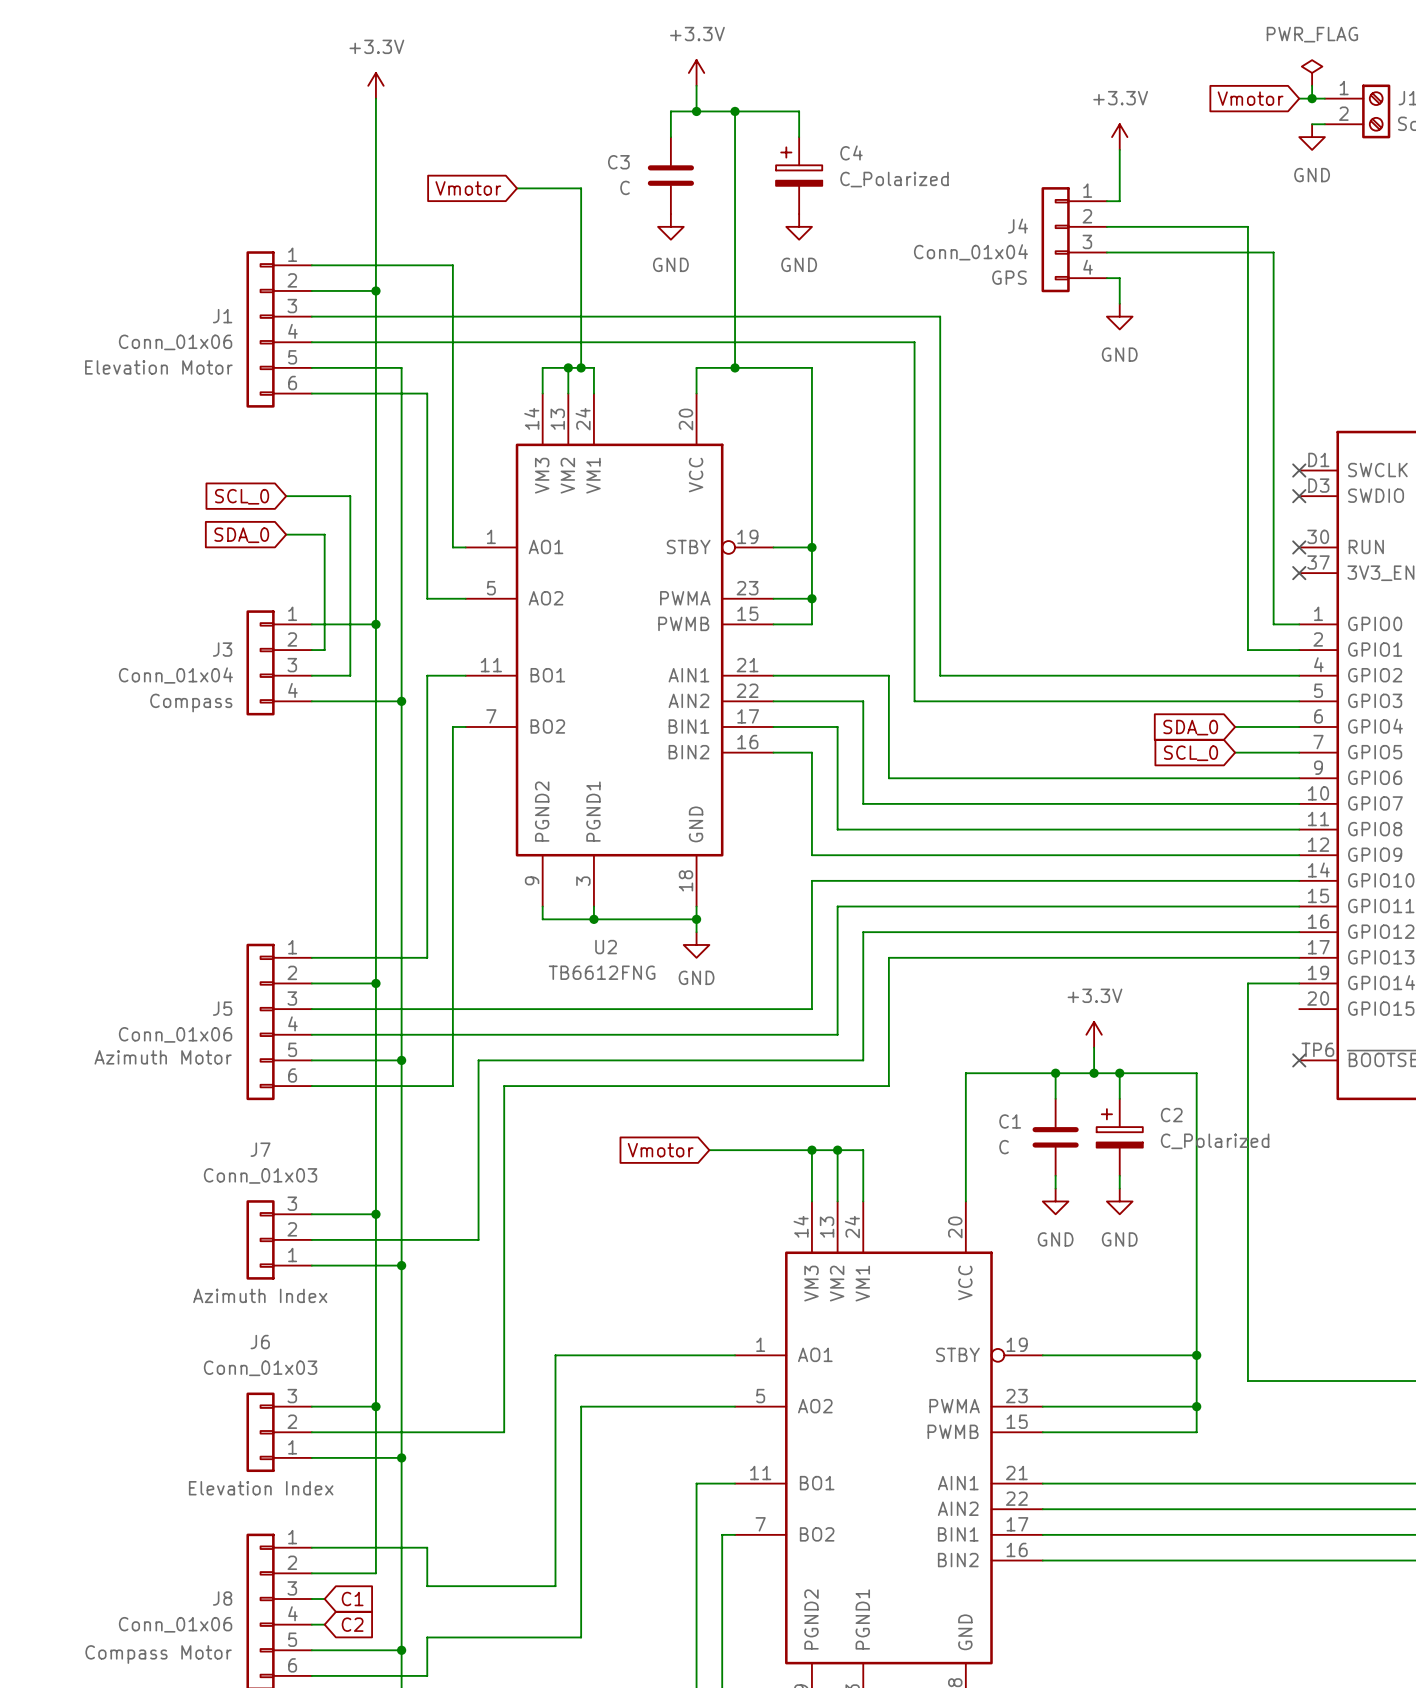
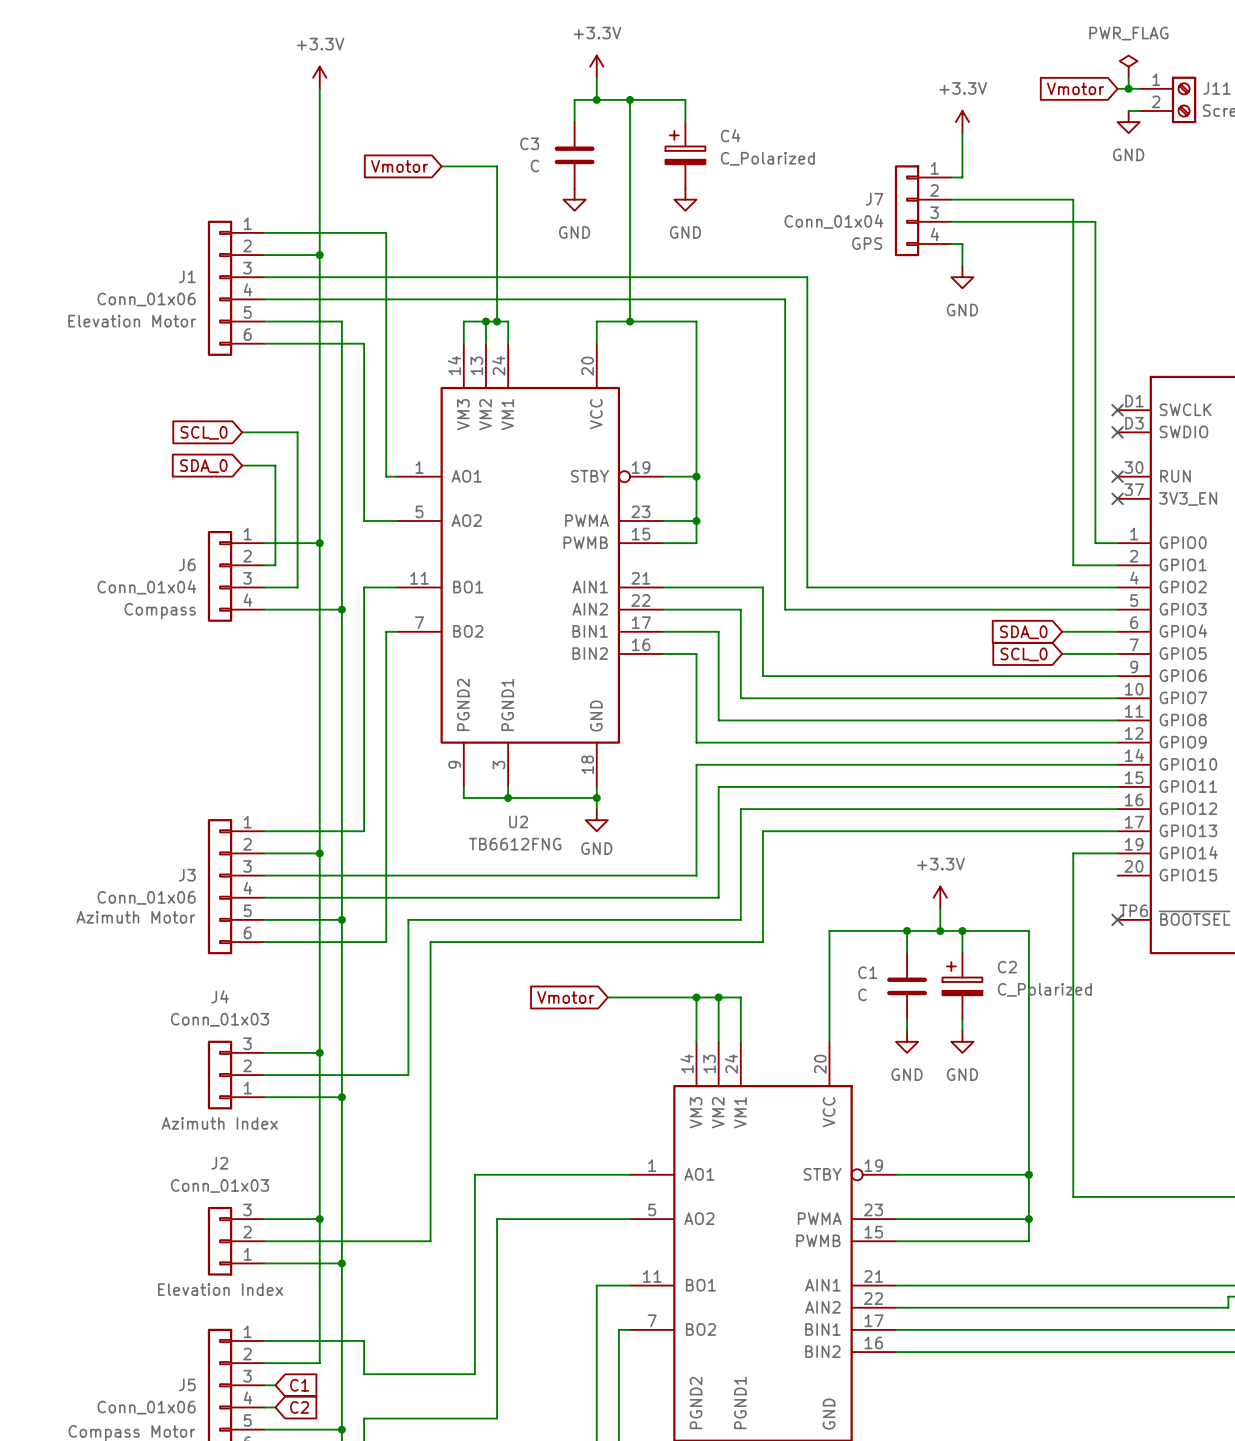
J4 name: J4 (1017, 226) -> J7 (874, 199)
J3 name: J3 (222, 649) -> J6 (187, 564)
J5 name: J5 (222, 1008) -> J3 (187, 875)
J7 name: J7 (260, 1149) -> J4 (220, 996)
J6 name: J6 (260, 1342) -> J2 (219, 1163)
J8 name: J8 (222, 1598) -> J5 (187, 1384)

